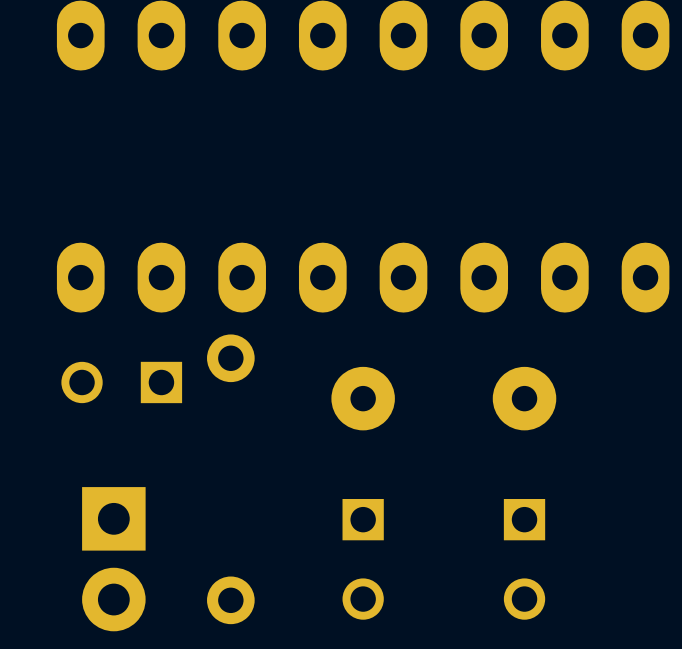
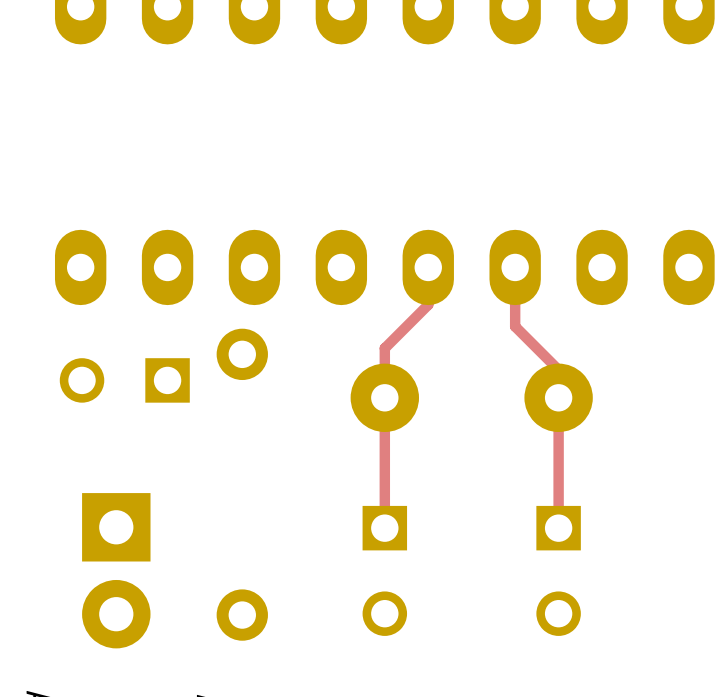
top track: none -> (428, 267) (428, 304) (384, 348) (384, 528)
top track: none -> (515, 267) (515, 326) (558, 370) (558, 528)

